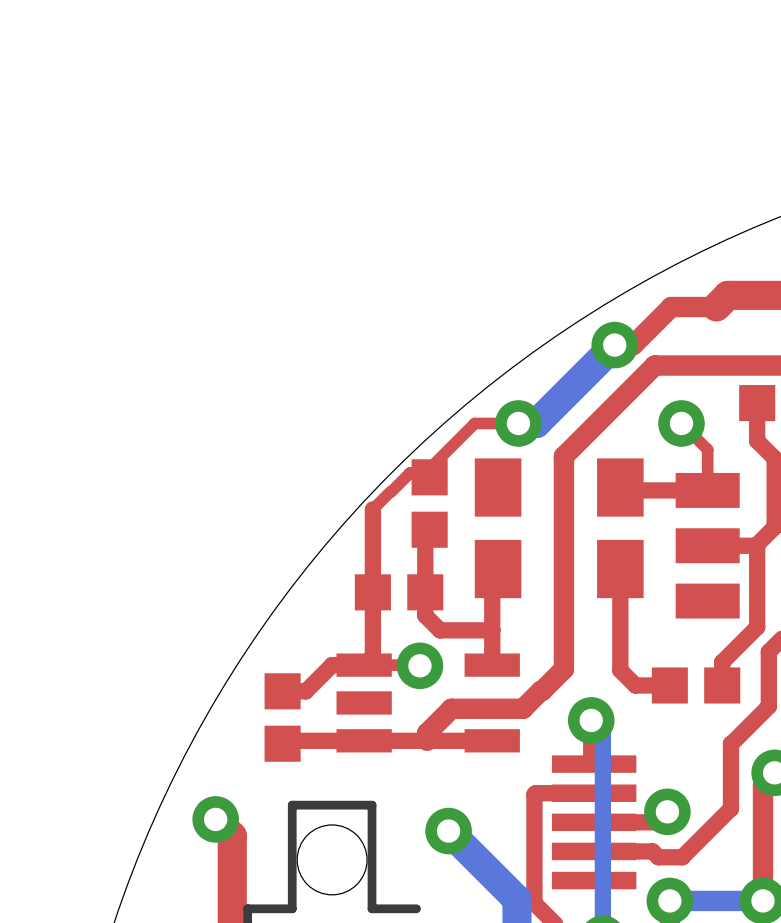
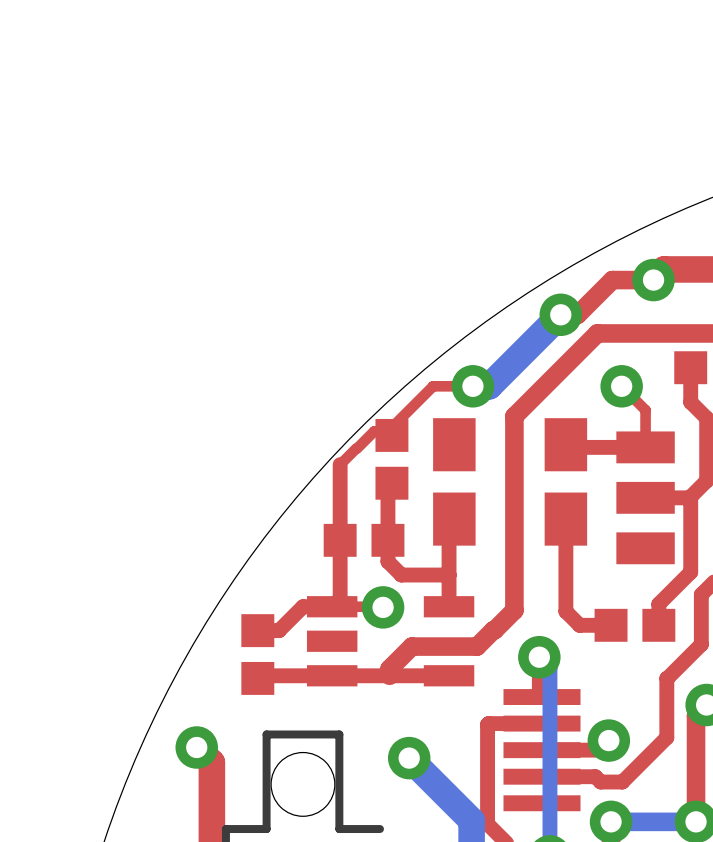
via: none -> (653, 280)

